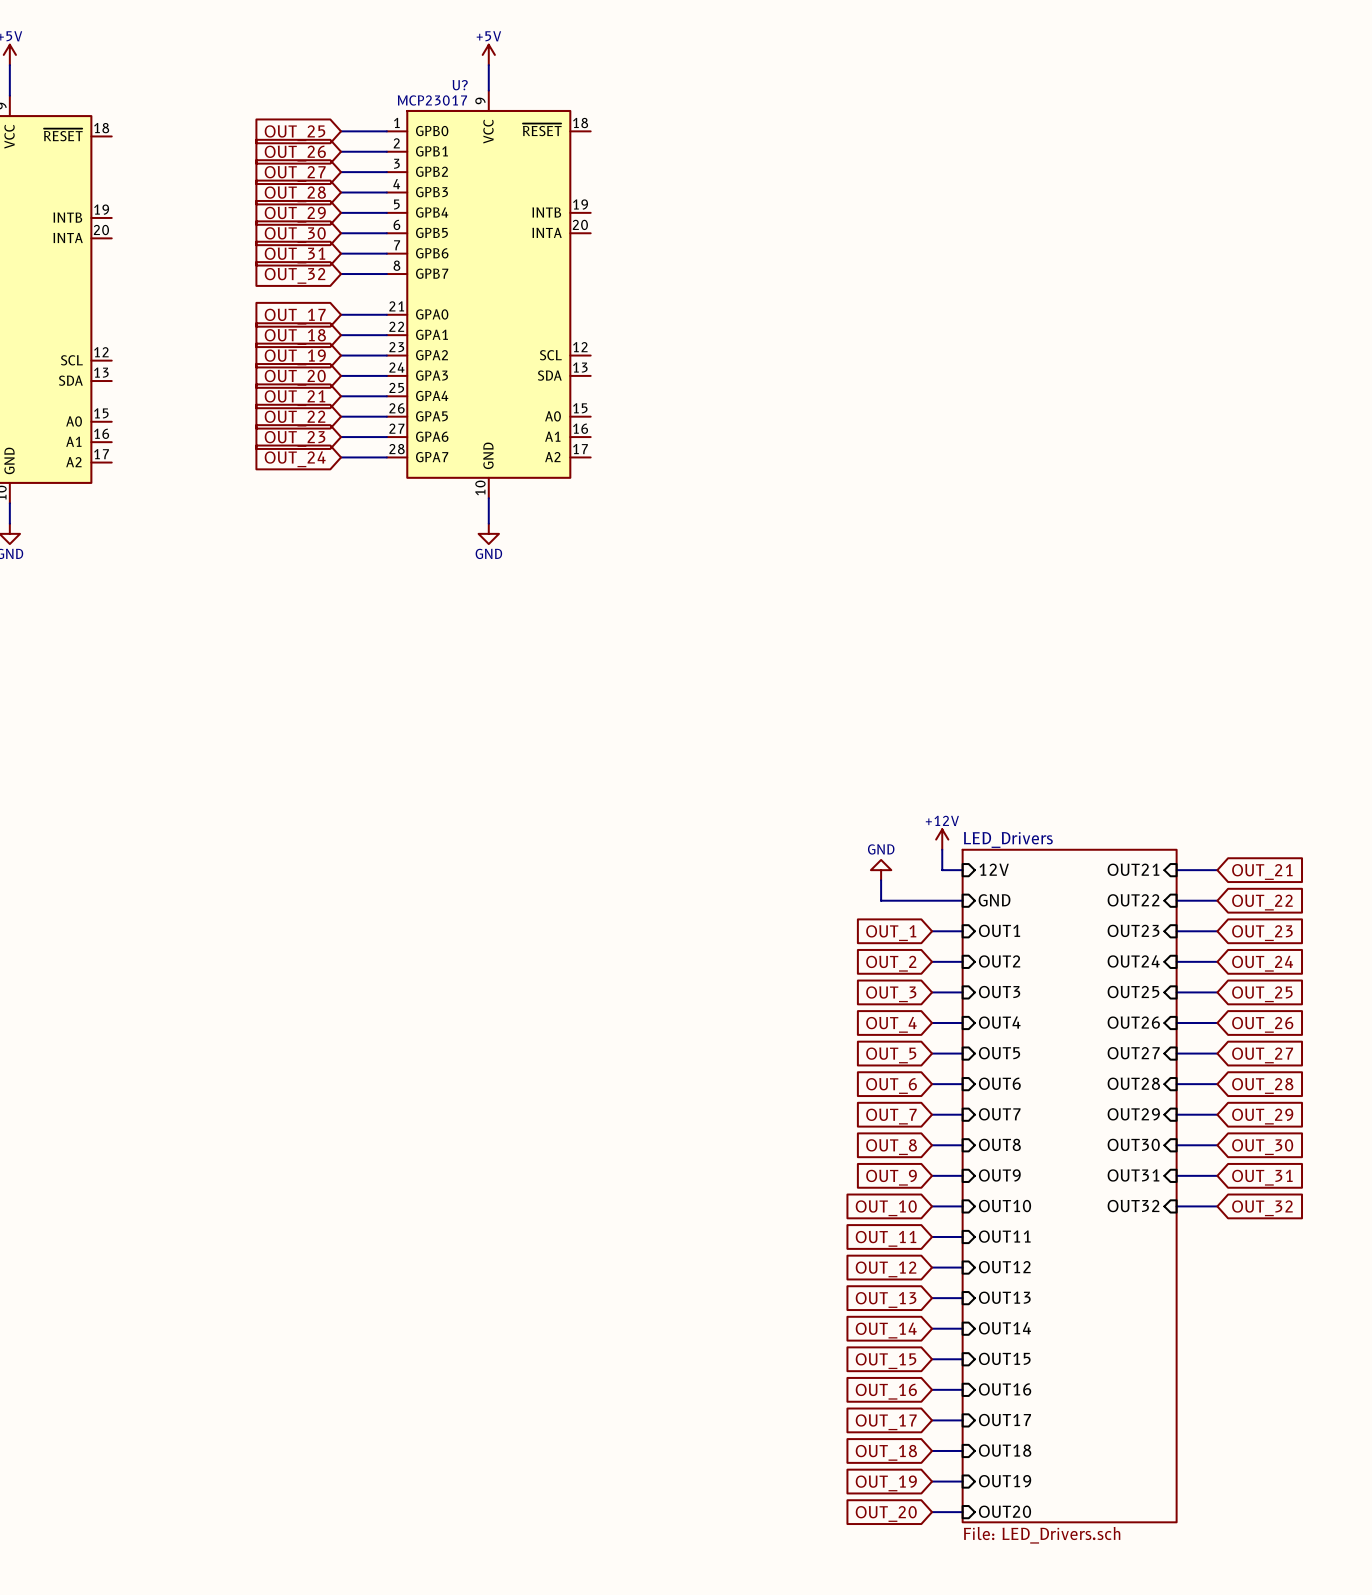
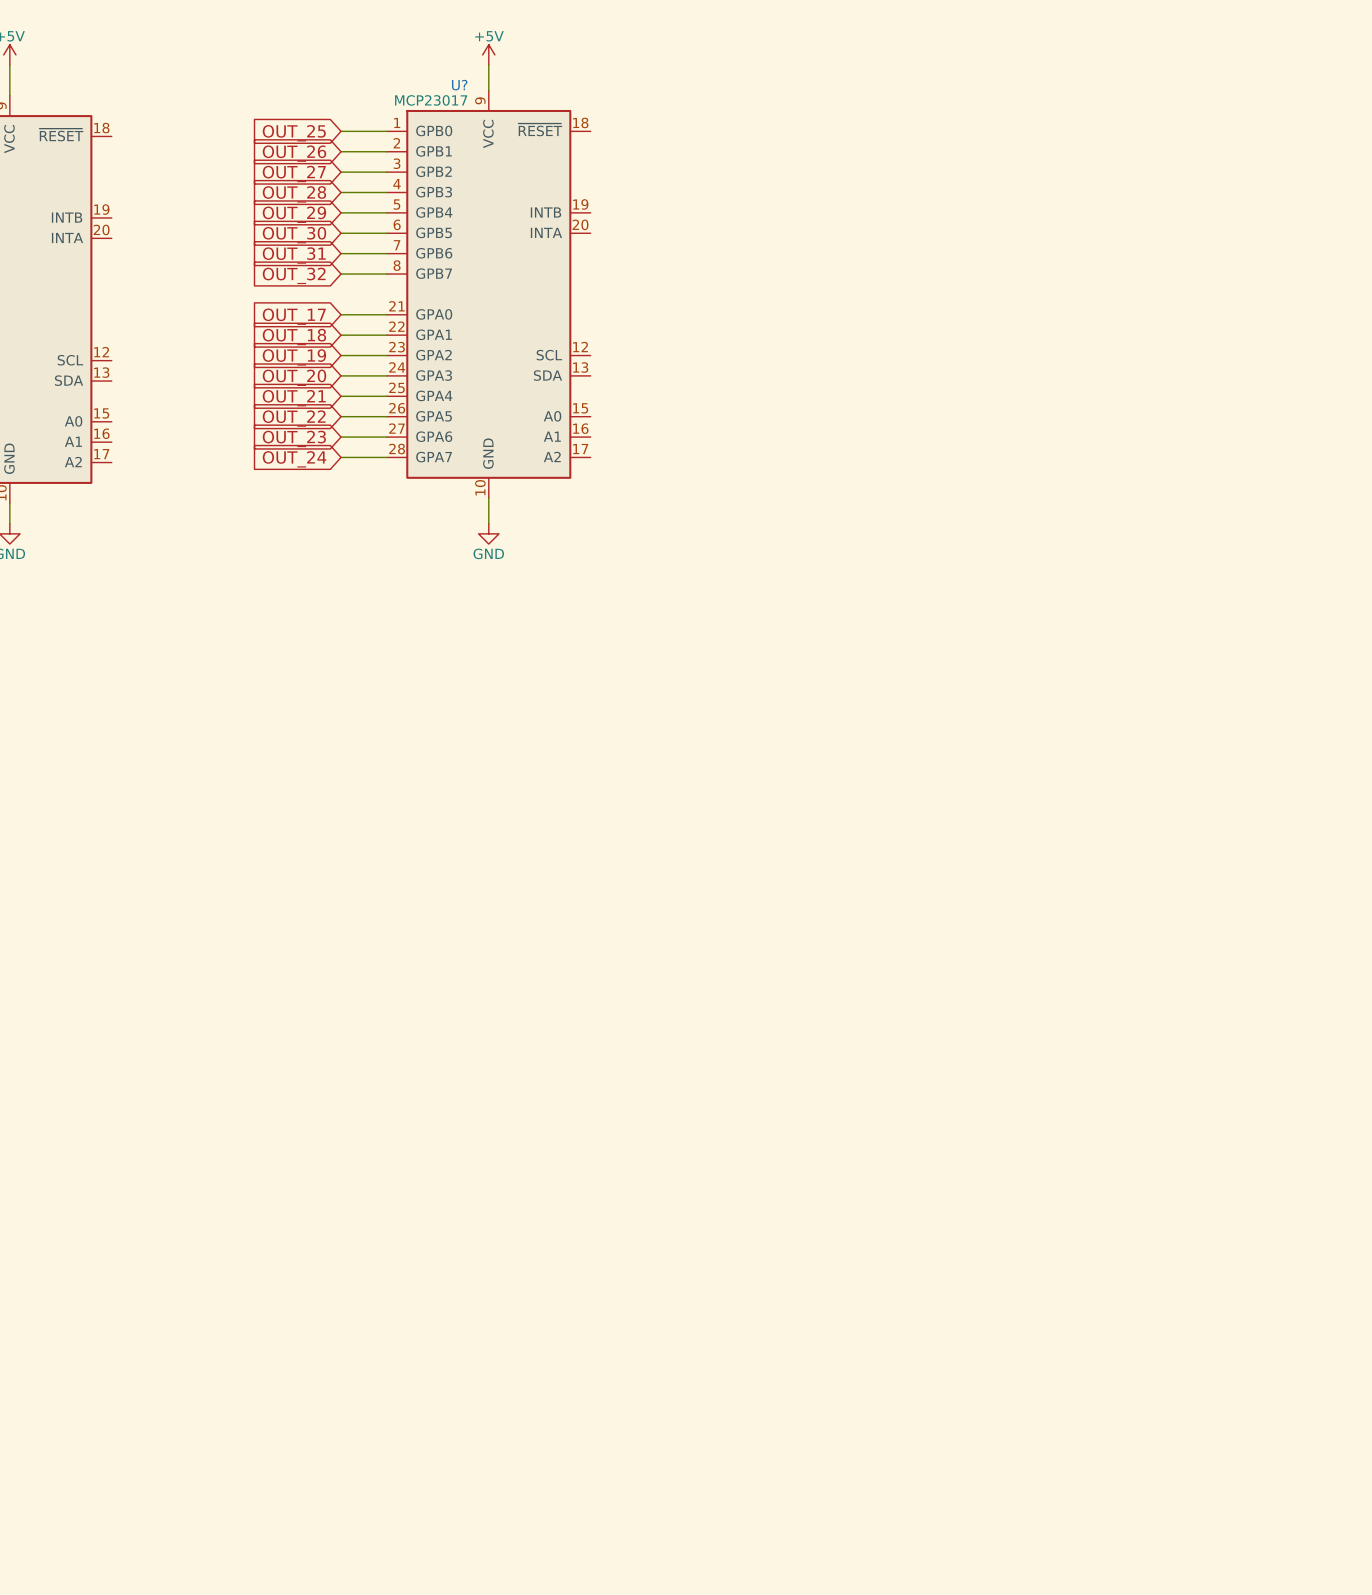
power symbol: +12V (942, 839) -> none
wire: (942, 849) (942, 870) (962, 870) -> none
sheet pin: 12V (994, 869) -> none
sheet pin: OUT21 (1133, 869) -> none
power symbol: GND (881, 870) -> none
wire: (1176, 870) (1217, 870) -> none
global label: OUT_21 (1262, 871) -> none
wire: (881, 880) (881, 900) (962, 900) -> none
sheet pin: GND (994, 900) -> none
sheet pin: OUT22 (1133, 900) -> none
wire: (1176, 900) (1217, 900) -> none
global label: OUT_22 (1262, 902) -> none
sheet pin: OUT1 (999, 930) -> none
sheet pin: OUT23 (1133, 930) -> none
wire: (932, 931) (962, 931) -> none
wire: (1176, 931) (1217, 931) -> none
global label: OUT_1 (891, 933) -> none
global label: OUT_23 (1262, 933) -> none
wire: (932, 961) (962, 961) -> none
sheet pin: OUT2 (999, 961) -> none
sheet pin: OUT24 (1133, 961) -> none
wire: (1176, 961) (1217, 961) -> none
global label: OUT_2 (891, 963) -> none
global label: OUT_24 (1262, 963) -> none
wire: (932, 992) (962, 992) -> none
sheet pin: OUT3 (999, 992) -> none
sheet pin: OUT25 (1133, 992) -> none
wire: (1176, 992) (1217, 992) -> none
global label: OUT_3 (891, 994) -> none
global label: OUT_25 (1262, 994) -> none
sheet pin: OUT4 (999, 1022) -> none
sheet pin: OUT26 (1133, 1022) -> none
wire: (932, 1023) (962, 1023) -> none
wire: (1176, 1023) (1217, 1023) -> none
global label: OUT_4 (891, 1024) -> none
global label: OUT_26 (1262, 1024) -> none
wire: (932, 1053) (962, 1053) -> none
sheet pin: OUT5 (999, 1053) -> none
sheet pin: OUT27 (1133, 1053) -> none
wire: (1176, 1053) (1217, 1053) -> none
global label: OUT_5 (891, 1055) -> none
global label: OUT_27 (1262, 1055) -> none
sheet pin: OUT6 (999, 1083) -> none
sheet pin: OUT28 (1133, 1083) -> none
wire: (932, 1084) (962, 1084) -> none
wire: (1176, 1084) (1217, 1084) -> none
global label: OUT_6 (891, 1085) -> none
global label: OUT_28 (1262, 1085) -> none
wire: (932, 1114) (962, 1114) -> none
sheet pin: OUT7 (999, 1114) -> none
sheet pin: OUT29 (1133, 1114) -> none
wire: (1176, 1114) (1217, 1114) -> none
global label: OUT_7 (891, 1116) -> none
global label: OUT_29 (1262, 1116) -> none
sheet pin: OUT8 (999, 1144) -> none
sheet pin: OUT30 (1133, 1144) -> none
wire: (932, 1145) (962, 1145) -> none
wire: (1176, 1145) (1217, 1145) -> none
global label: OUT_8 (891, 1147) -> none
global label: OUT_30 (1262, 1147) -> none
wire: (932, 1175) (962, 1175) -> none
sheet pin: OUT9 (999, 1175) -> none
sheet pin: OUT31 (1133, 1175) -> none
wire: (1176, 1175) (1217, 1175) -> none
global label: OUT_9 (891, 1177) -> none
global label: OUT_31 (1262, 1177) -> none
sheet LED_Drivers: File: LED_Drivers.sch (1069, 1186) -> none
wire: (932, 1206) (962, 1206) -> none
sheet pin: OUT10 (1005, 1206) -> none
sheet pin: OUT32 (1133, 1206) -> none
wire: (1176, 1206) (1217, 1206) -> none
global label: OUT_10 (886, 1208) -> none
global label: OUT_32 (1262, 1208) -> none
wire: (932, 1236) (962, 1236) -> none
sheet pin: OUT11 (1004, 1236) -> none
global label: OUT_11 (886, 1238) -> none
wire: (932, 1267) (962, 1267) -> none
sheet pin: OUT12 (1004, 1267) -> none
global label: OUT_12 (886, 1269) -> none
sheet pin: OUT13 (1004, 1297) -> none
wire: (932, 1298) (962, 1298) -> none
global label: OUT_13 (886, 1299) -> none
wire: (932, 1328) (962, 1328) -> none
sheet pin: OUT14 (1004, 1328) -> none
global label: OUT_14 (886, 1330) -> none
sheet pin: OUT15 (1004, 1358) -> none
wire: (932, 1359) (962, 1359) -> none
global label: OUT_15 (886, 1361) -> none
wire: (932, 1389) (962, 1389) -> none
sheet pin: OUT16 (1005, 1389) -> none
global label: OUT_16 (886, 1391) -> none
wire: (932, 1420) (962, 1420) -> none
sheet pin: OUT17 (1004, 1420) -> none
global label: OUT_17 (886, 1422) -> none
wire: (932, 1450) (962, 1450) -> none
sheet pin: OUT18 (1005, 1450) -> none
global label: OUT_18 (886, 1452) -> none
wire: (932, 1481) (962, 1481) -> none
sheet pin: OUT19 (1005, 1481) -> none
global label: OUT_19 (886, 1483) -> none
sheet pin: OUT20 (1005, 1511) -> none
wire: (932, 1512) (962, 1512) -> none
global label: OUT_20 (886, 1513) -> none

